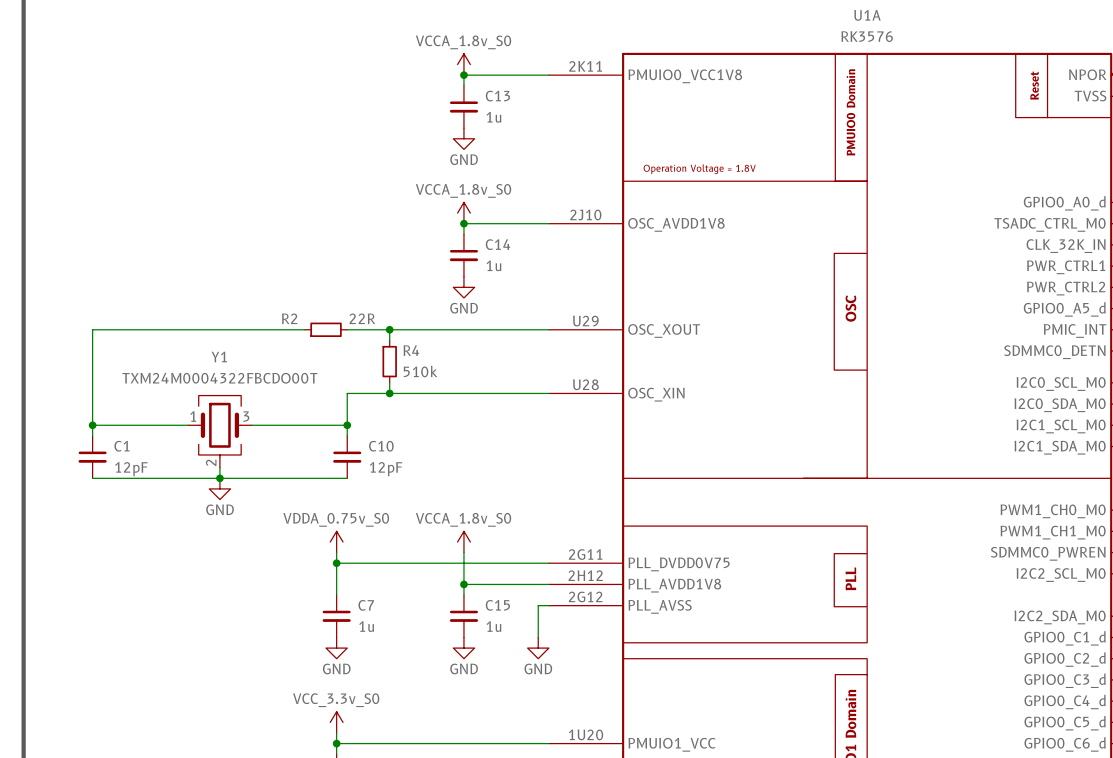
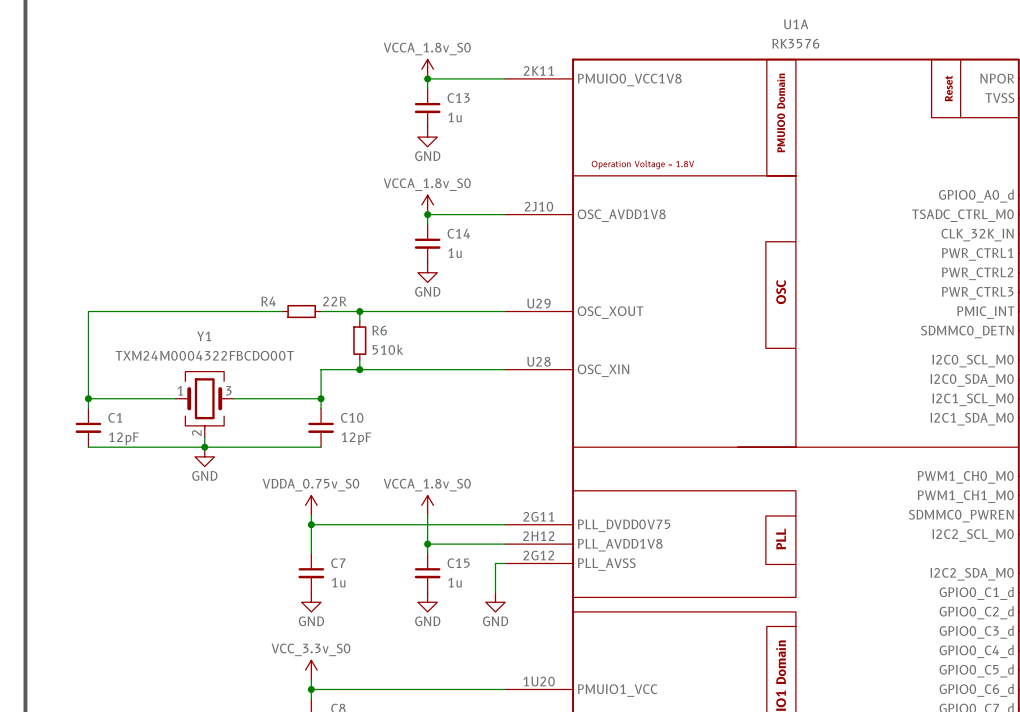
U1A pin name: GPIO0_A5_d (1064, 309) -> PWR_CTRL3 (977, 293)
R2 name: R2 (289, 318) -> R4 (268, 301)
R4 name: R4 (411, 350) -> R6 (379, 330)

